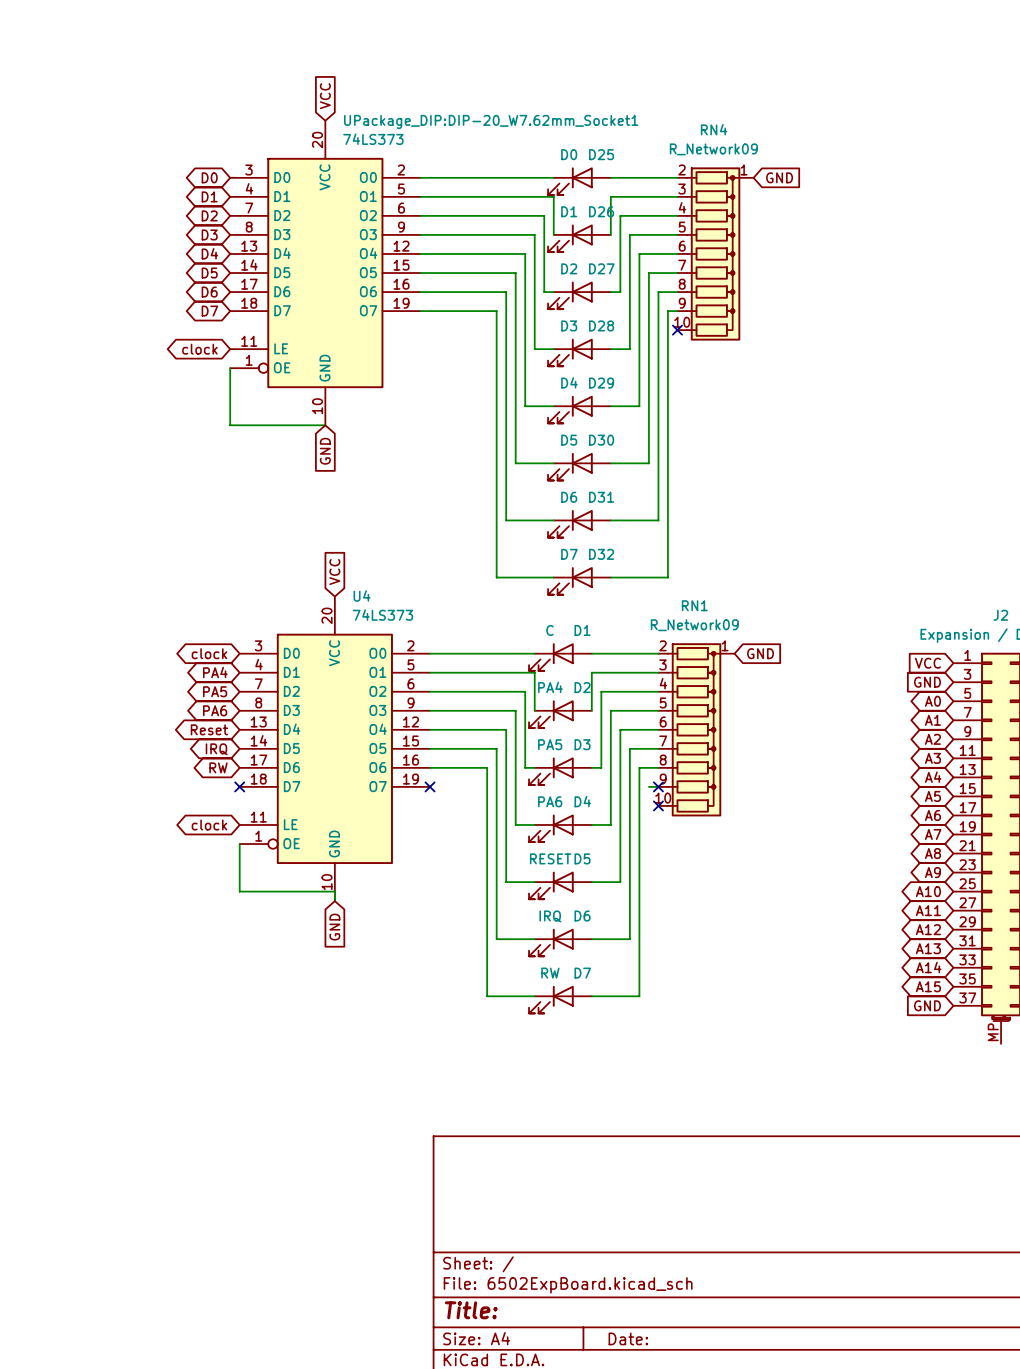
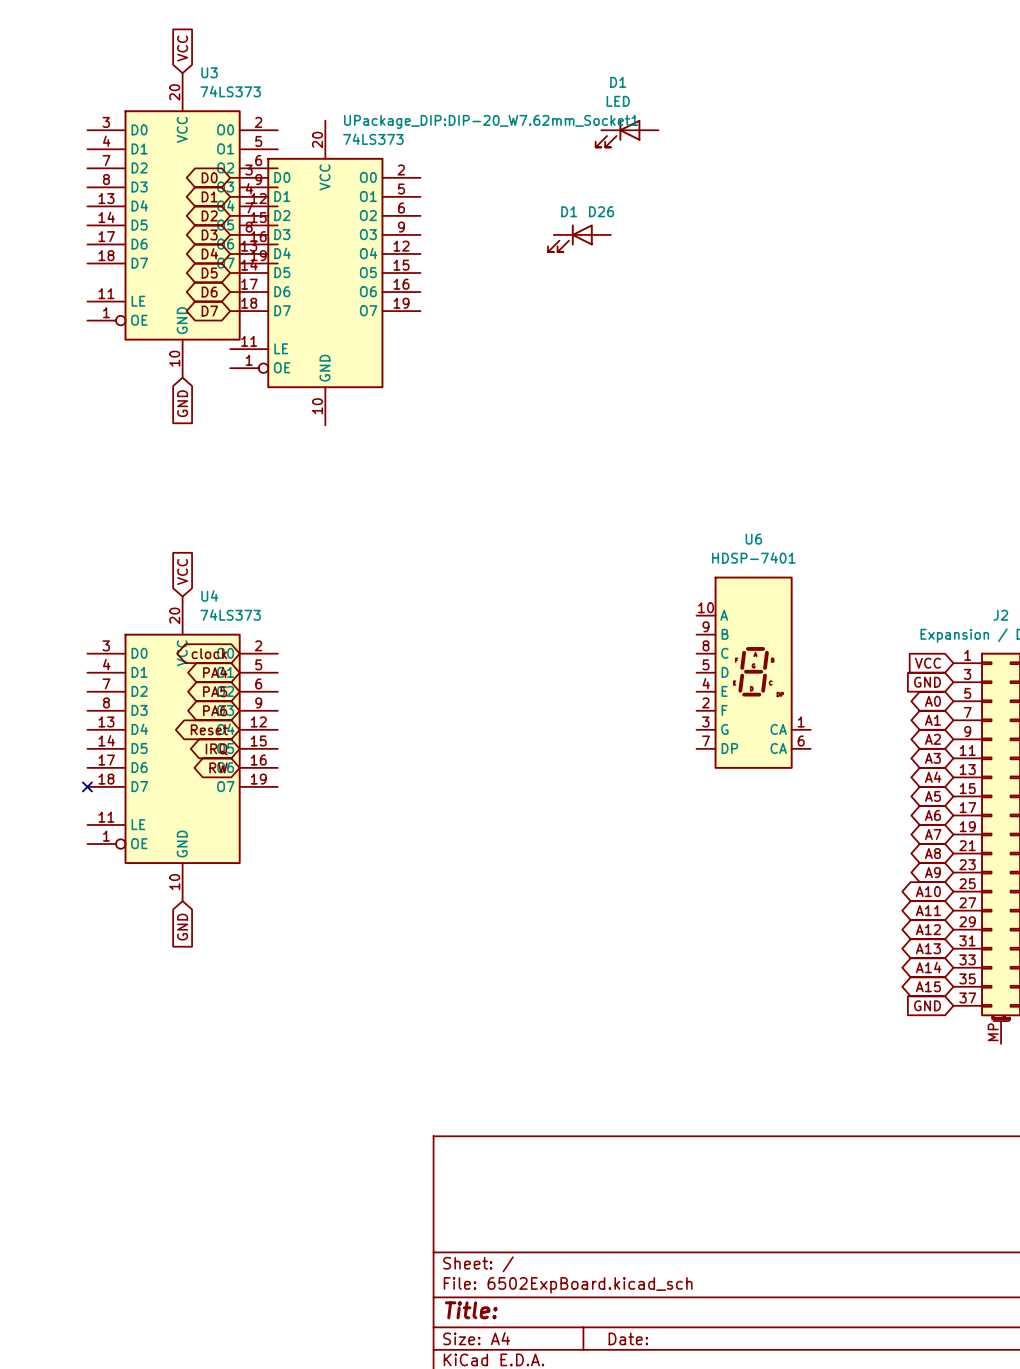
global label position: VCC (325, 96) -> VCC (182, 48)
wire: (420, 177) (553, 177) -> none
wire: (610, 177) (677, 177) -> none
global label: GND (779, 177) -> none
D25: D0 (579, 181) -> none
wire: (420, 196) (553, 196) (553, 234) -> none
wire: (677, 196) (610, 196) (610, 234) -> none
wire: (420, 215) (544, 215) (544, 292) (553, 292) -> none
wire: (677, 215) (620, 215) (620, 292) (610, 292) -> none
U3: none -> 74LS373 (182, 225)
wire: (420, 234) (534, 234) (534, 349) (553, 349) -> none
wire: (677, 234) (629, 234) (629, 349) (610, 349) -> none
wire: (420, 253) (525, 253) (525, 406) (553, 406) -> none
wire: (677, 253) (639, 253) (639, 406) (610, 406) -> none
RN4: R_Network09 (715, 253) -> none
wire: (420, 273) (515, 273) (515, 463) (553, 463) -> none
wire: (677, 273) (648, 273) (648, 463) (610, 463) -> none
wire: (420, 292) (506, 292) (506, 520) (553, 520) -> none
wire: (677, 292) (658, 292) (658, 520) (610, 520) -> none
D27: D2 (579, 295) -> none
wire: (420, 311) (496, 311) (496, 577) (553, 577) -> none
wire: (677, 311) (667, 311) (667, 577) (610, 577) -> none
no-connect mark: (677, 330) -> none
global label: clock (199, 349) -> none
D28: D3 (579, 352) -> none
wire: (230, 368) (230, 425) (325, 425) -> none
D29: D4 (579, 409) -> none
global label position: GND (325, 451) -> GND (182, 403)
D30: D5 (579, 466) -> none
D31: D6 (579, 523) -> none
global label position: VCC (334, 571) -> VCC (182, 571)
D32: D7 (579, 580) -> none
D1 value: C (549, 630) -> LED (618, 101)
D1 name position: D1 (582, 630) -> D1 (618, 82)
wire: (430, 653) (534, 653) -> none
wire: (591, 653) (658, 653) -> none
global label: GND (760, 653) -> none
D1 position: (560, 657) -> (627, 133)
wire: (430, 672) (534, 672) (534, 710) -> none
wire: (658, 672) (591, 672) (591, 710) -> none
U6: none -> HDSP-7401 (753, 672)
wire: (430, 691) (525, 691) (525, 767) (534, 767) -> none
wire: (658, 691) (601, 691) (601, 767) (591, 767) -> none
wire: (430, 710) (515, 710) (515, 824) (534, 824) -> none
wire: (658, 710) (610, 710) (610, 824) (591, 824) -> none
D2: PA4 (560, 714) -> none
wire: (430, 729) (506, 729) (506, 882) (534, 882) -> none
wire: (658, 729) (620, 729) (620, 882) (591, 882) -> none
RN1: R_Network09 (696, 729) -> none
U4 position: (334, 748) -> (182, 748)
wire: (430, 748) (496, 748) (496, 939) (534, 939) -> none
wire: (658, 748) (629, 748) (629, 939) (591, 939) -> none
wire: (430, 767) (487, 767) (487, 996) (534, 996) -> none
wire: (658, 767) (639, 767) (639, 996) (591, 996) -> none
D3: PA5 (560, 771) -> none
no-connect mark: none -> (87, 786)
no-connect mark: (239, 786) -> none
no-connect mark: (430, 786) -> none
wire: (648, 786) (658, 786) -> none
no-connect mark: (658, 786) -> none
no-connect mark: (658, 805) -> none
global label: clock (209, 824) -> none
D4: PA6 (560, 828) -> none
wire: (239, 844) (239, 891) (334, 891) (334, 901) -> none
D5: RESET (560, 885) -> none
global label position: GND (334, 927) -> GND (182, 927)
D6: IRQ (560, 942) -> none
D7: RW (560, 999) -> none

